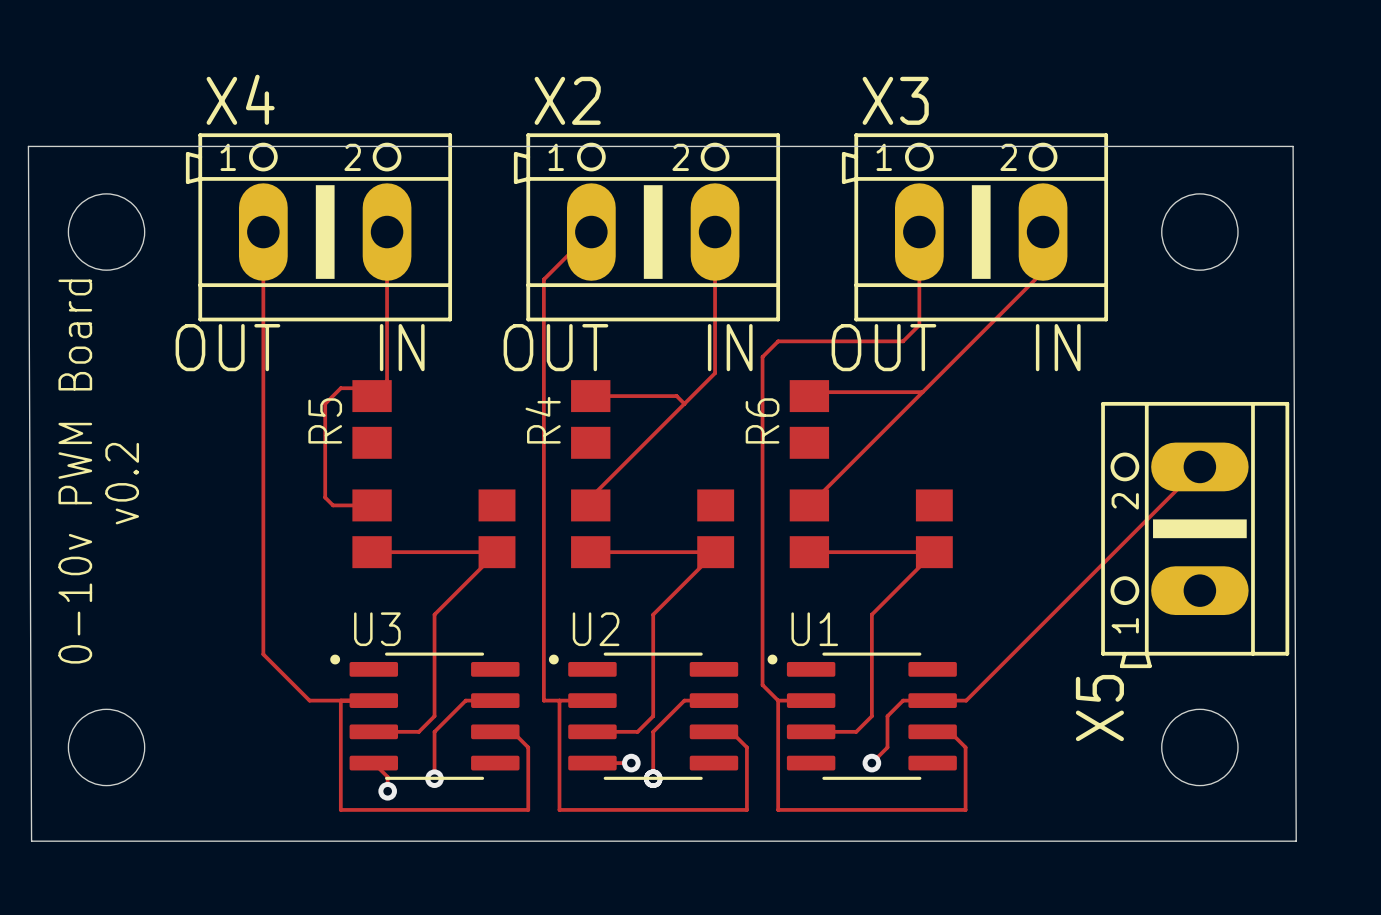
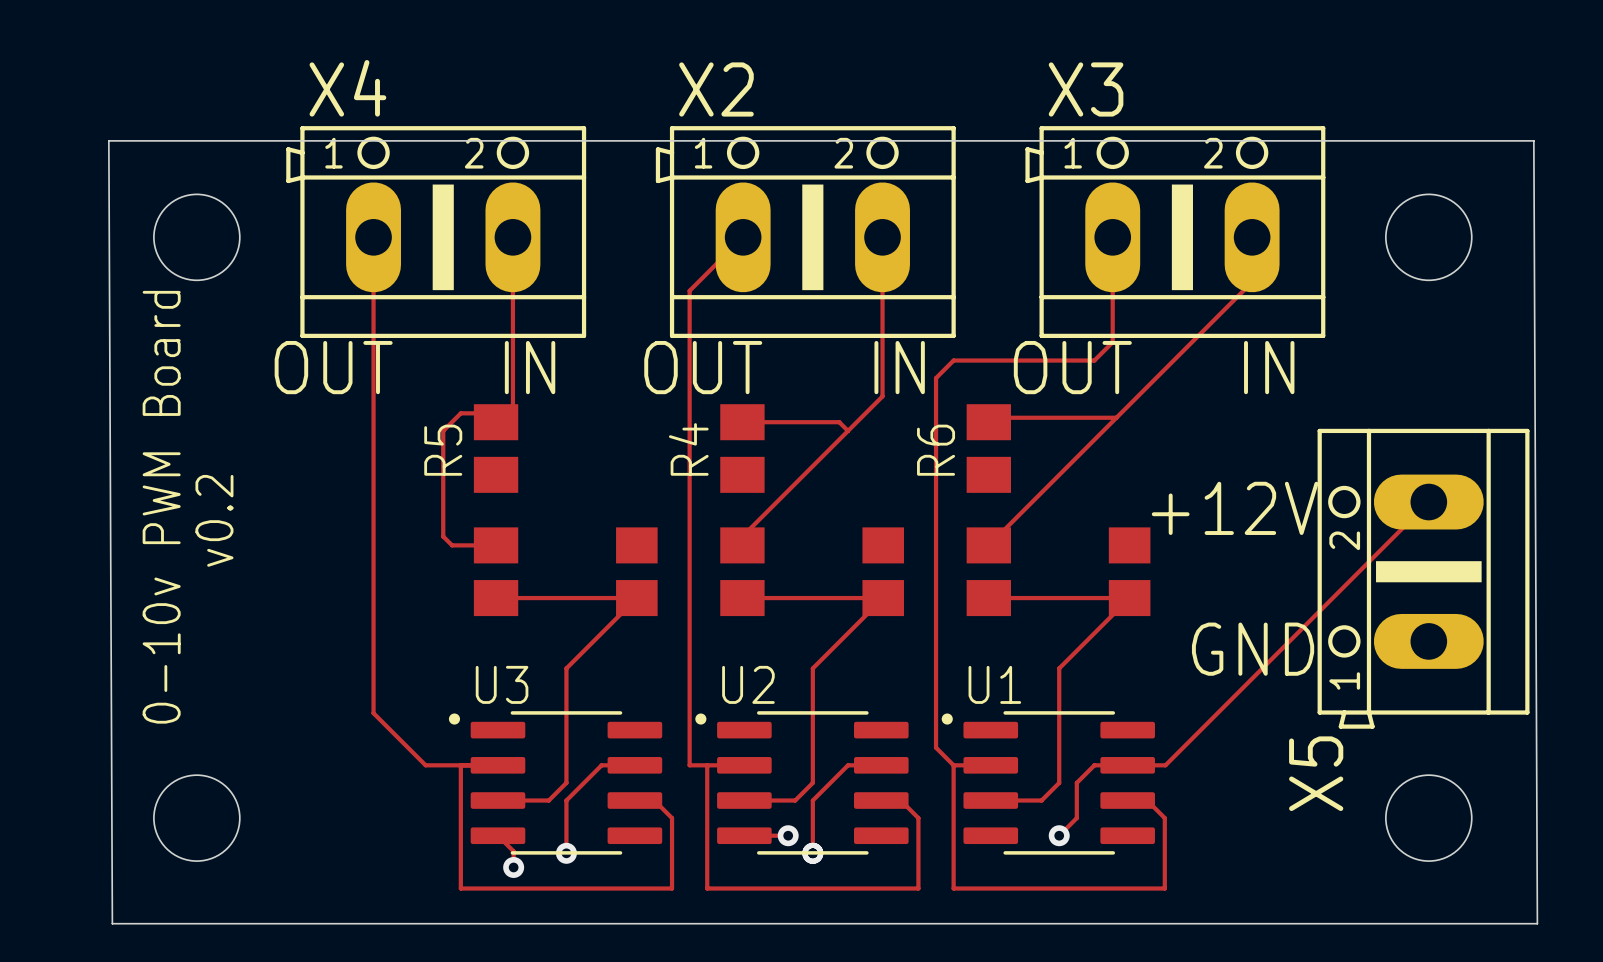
text: none -> +12V (1235, 508)
text: none -> GND (1253, 649)

